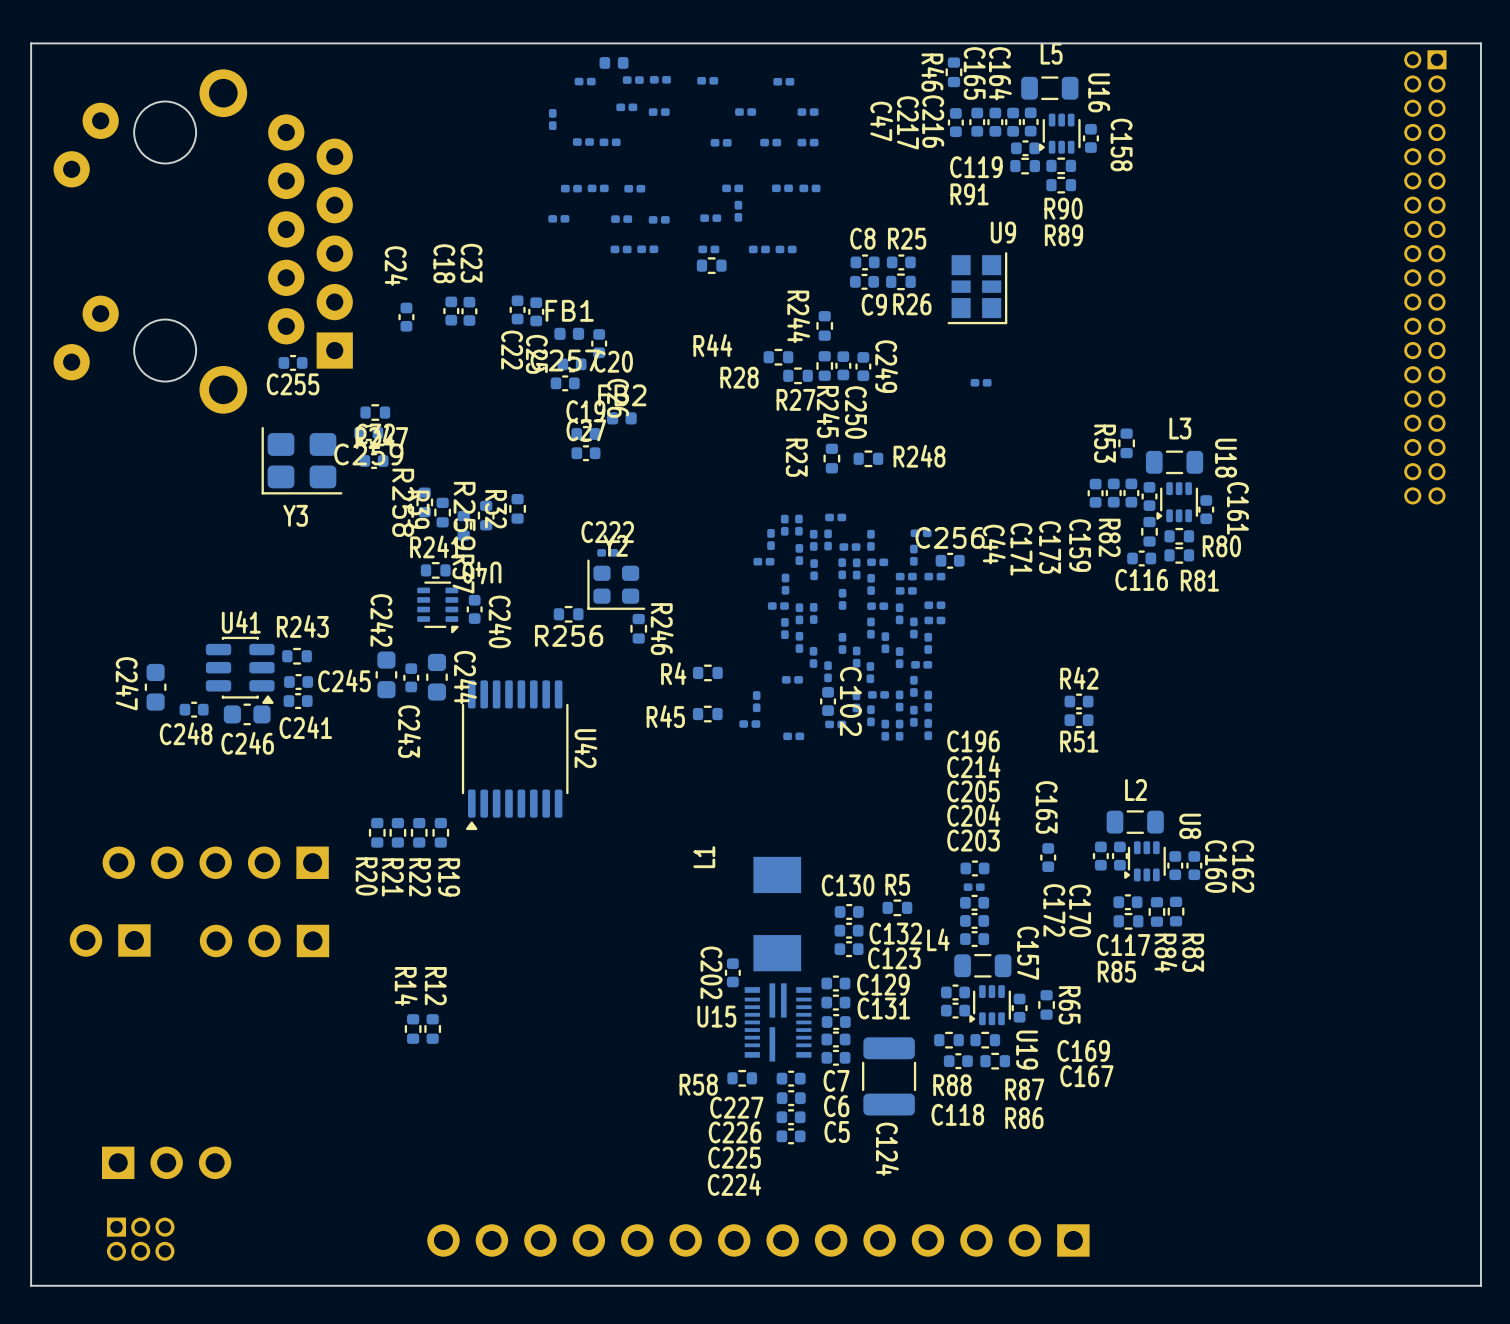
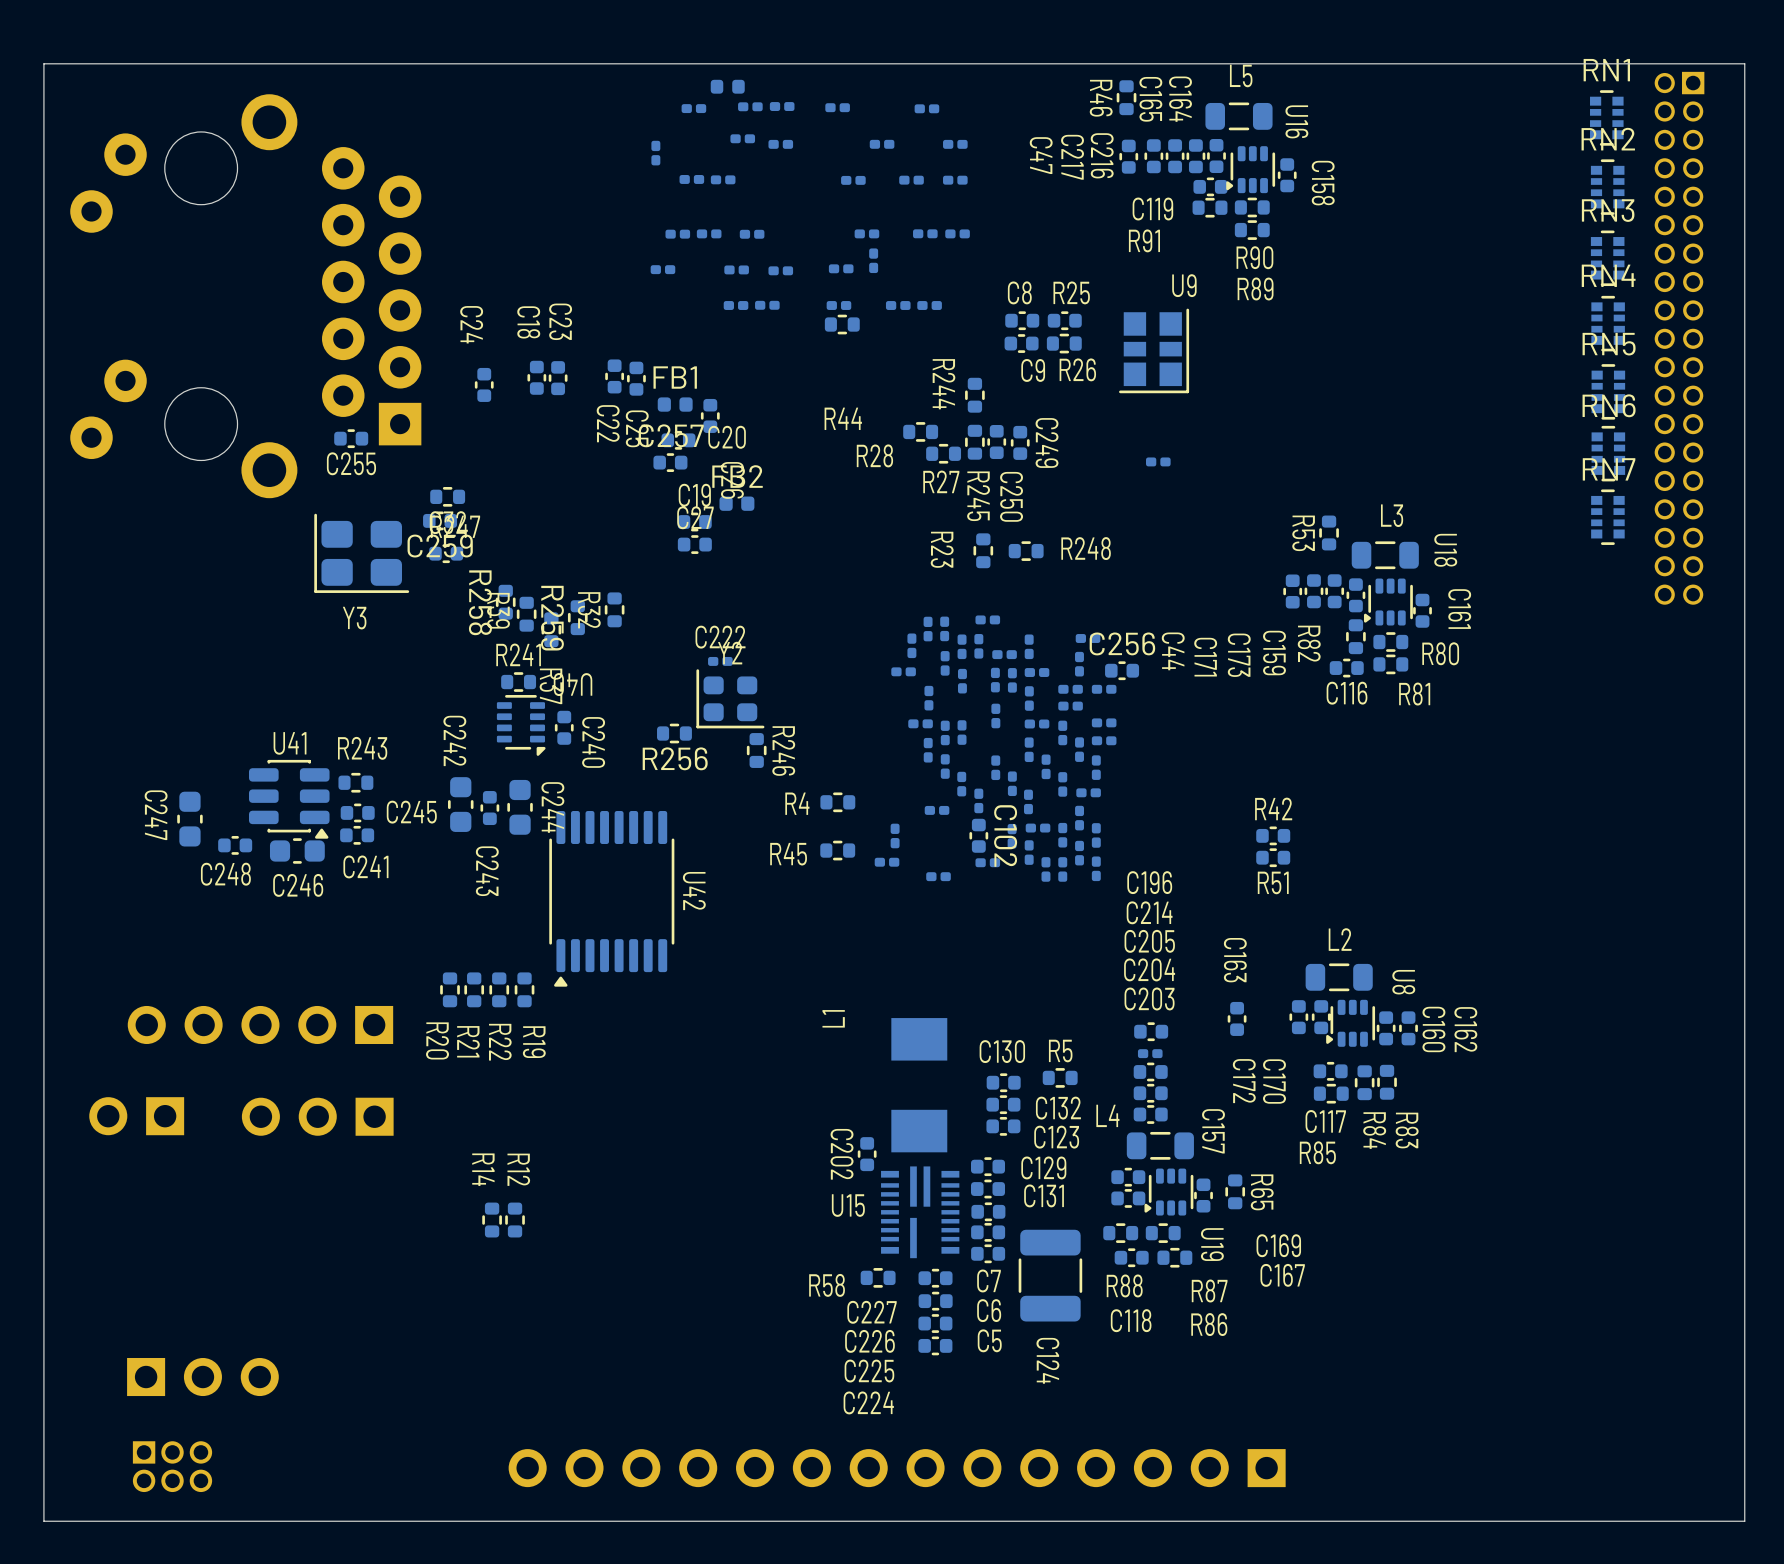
RN1: none -> (1606, 117)
RN2: none -> (1607, 187)
RN3: none -> (1607, 258)
RN4: none -> (1608, 323)
RN5: none -> (1608, 391)
RN6: none -> (1608, 453)
RN7: none -> (1607, 517)

